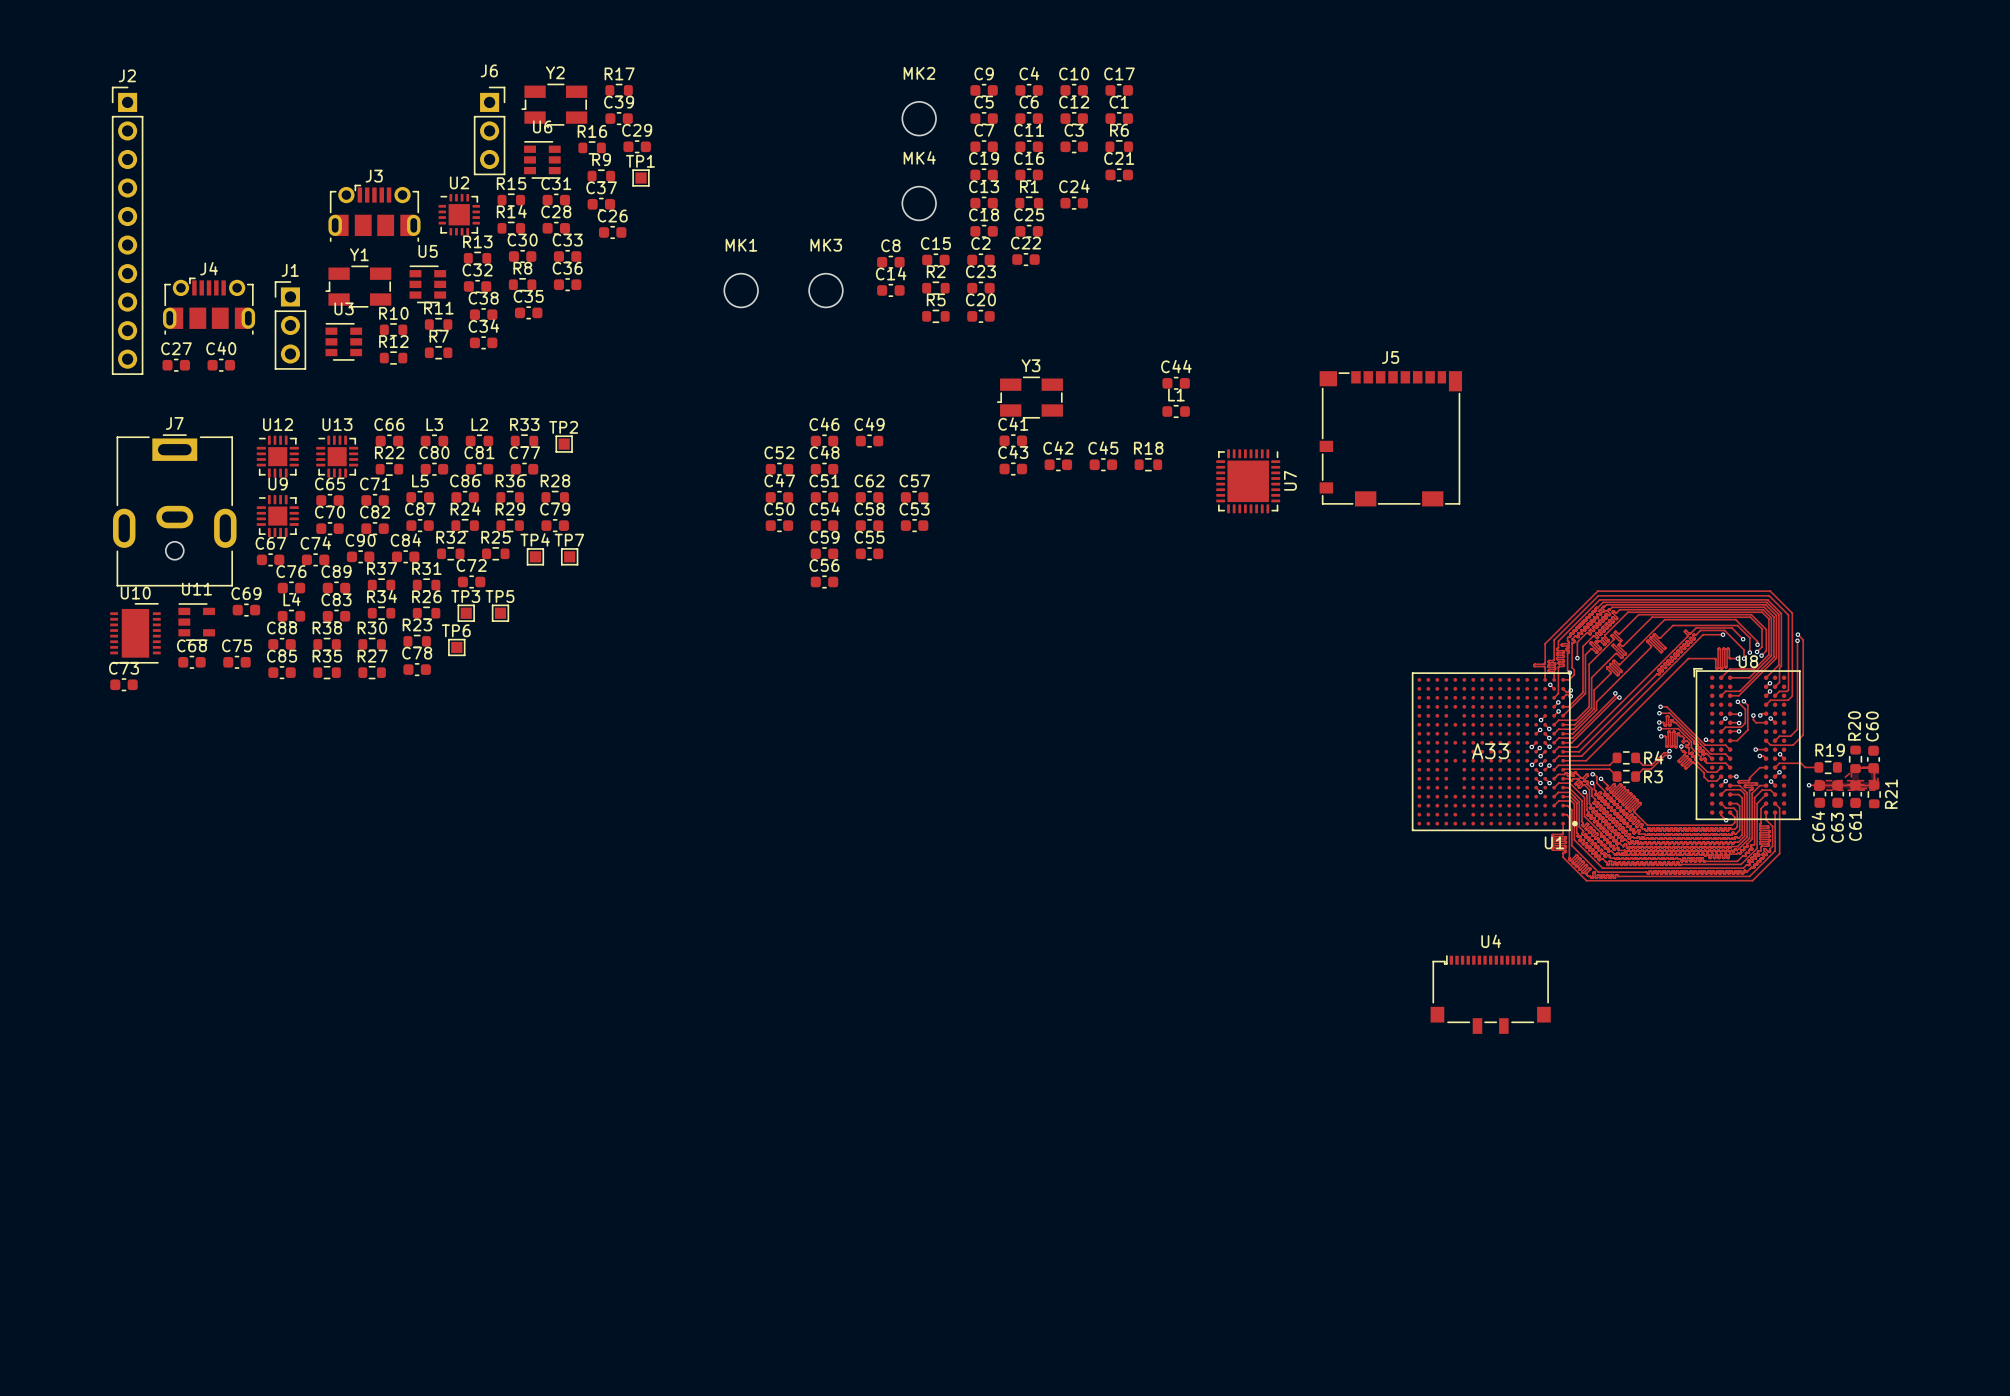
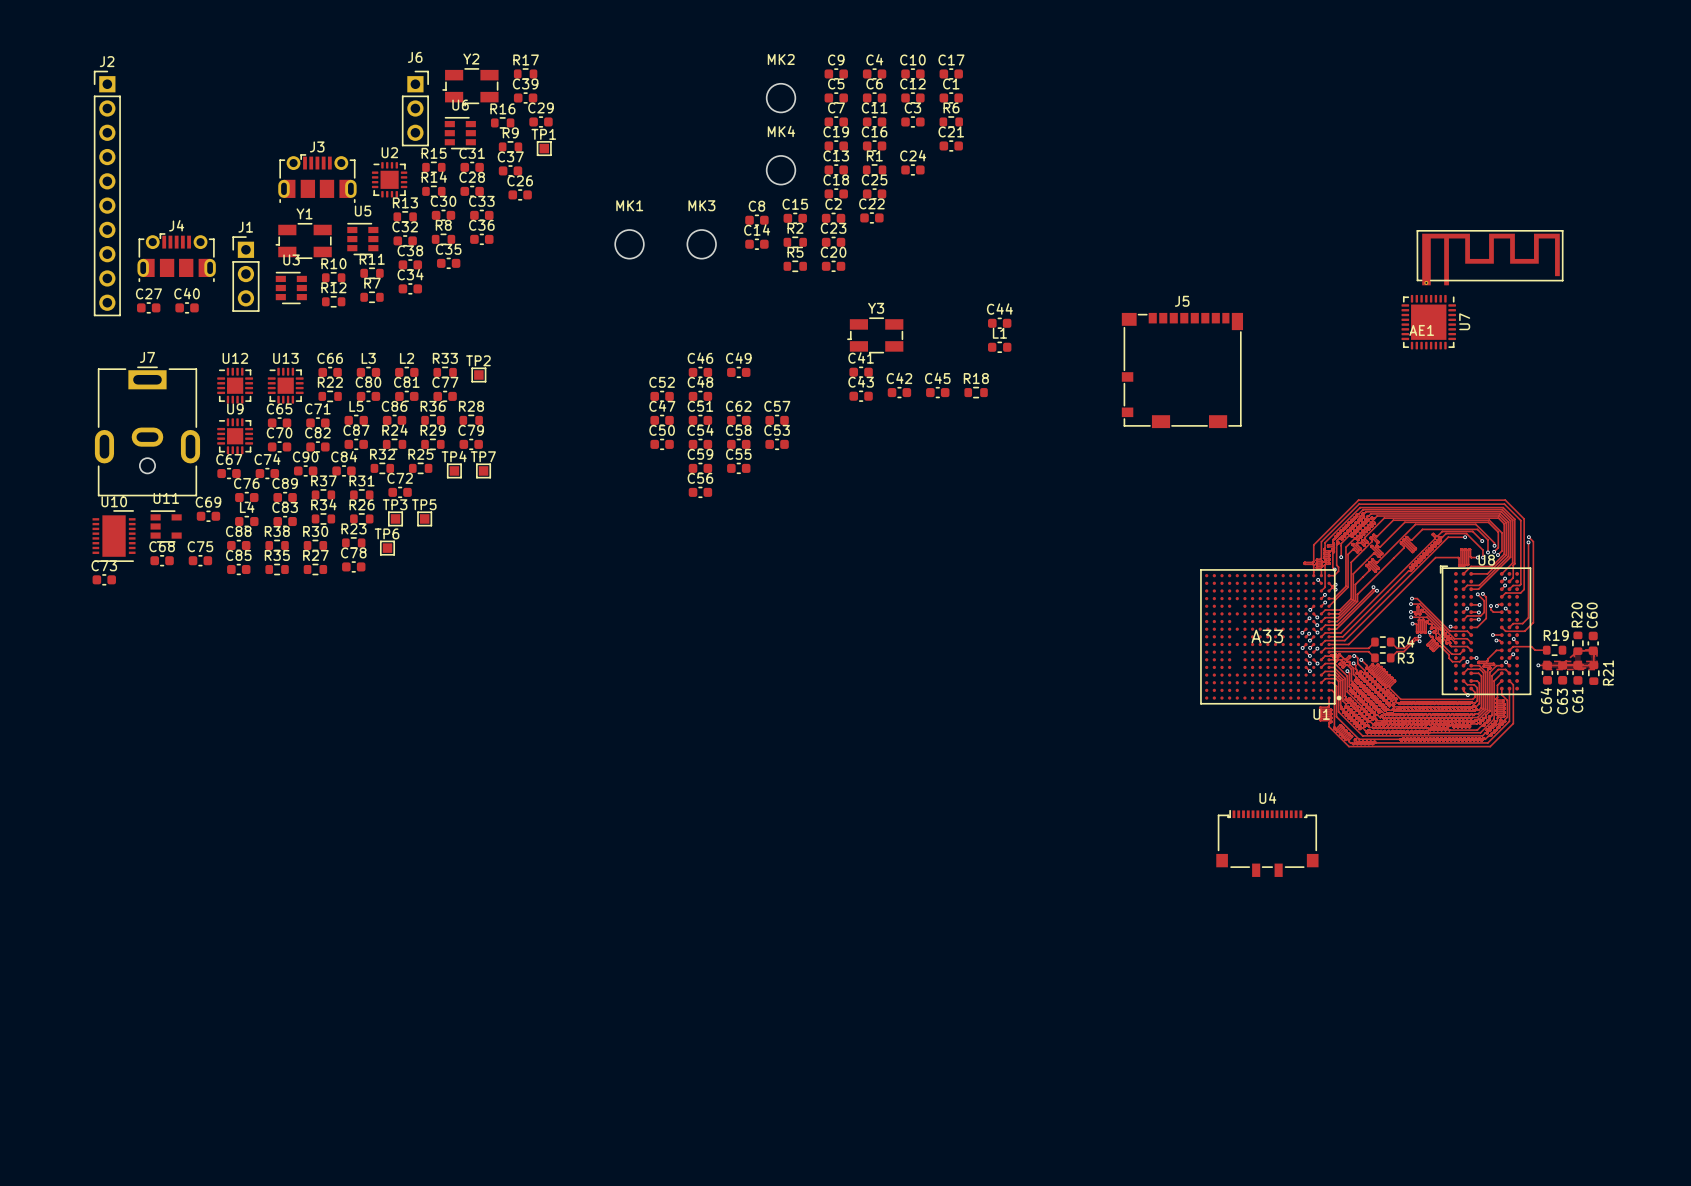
AE1: none -> (1490, 257)
U7 position: (1248, 481) -> (1428, 322)

